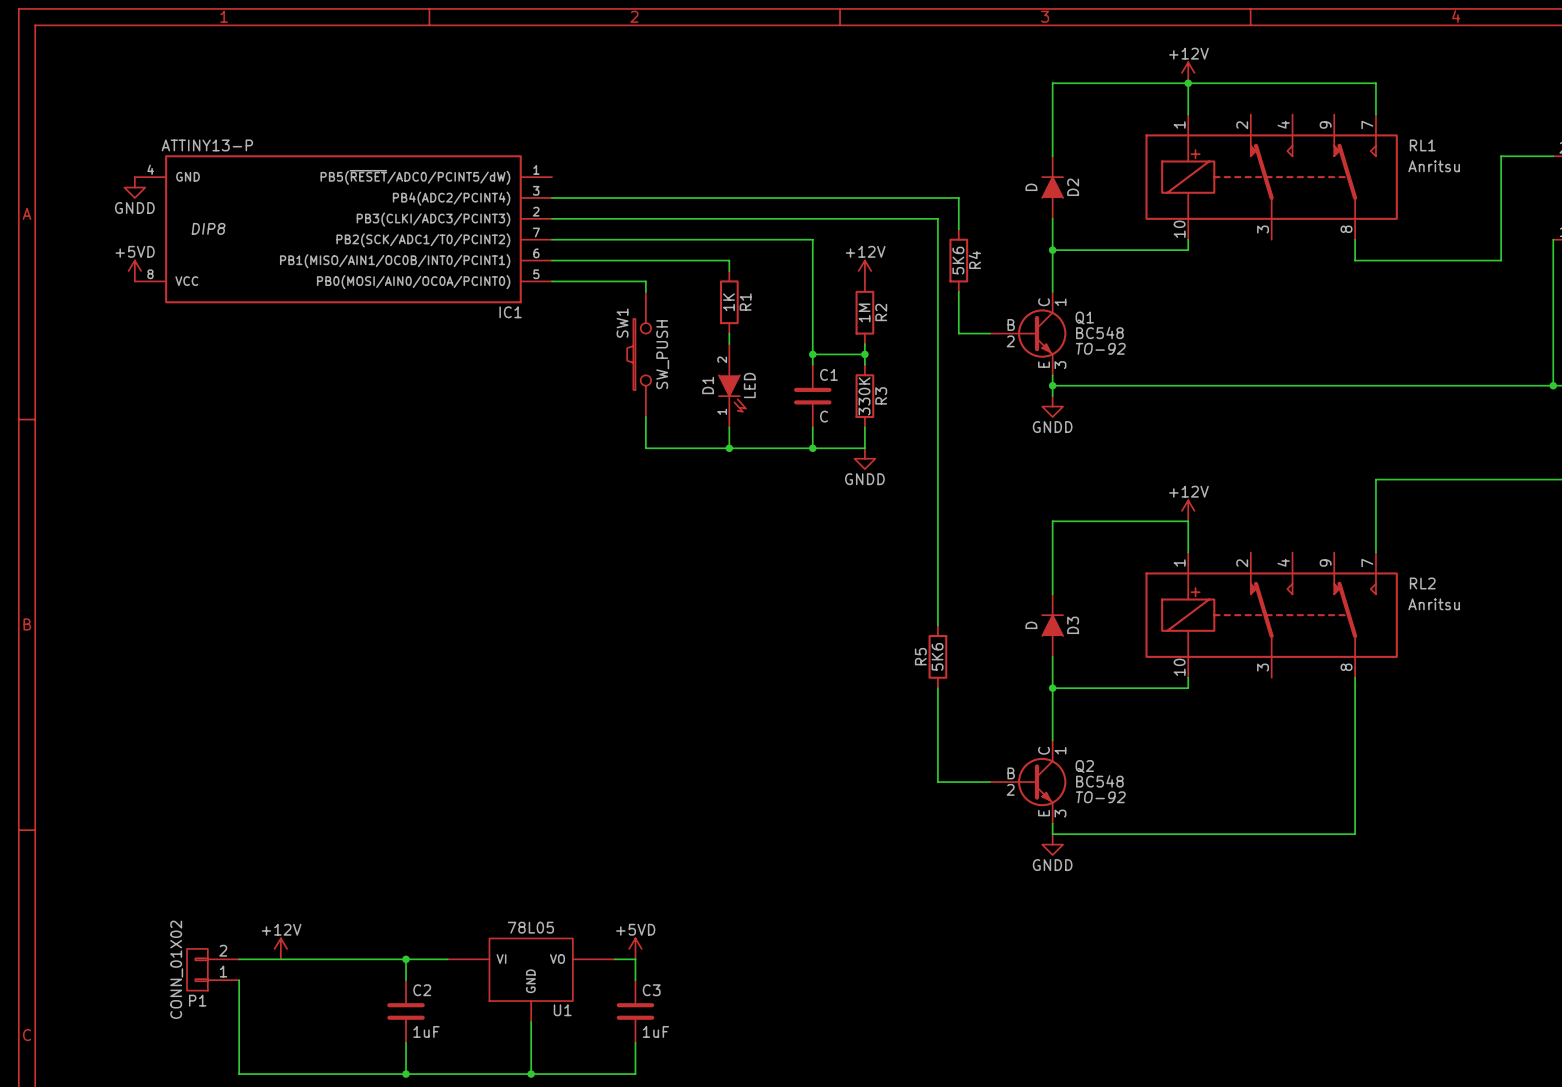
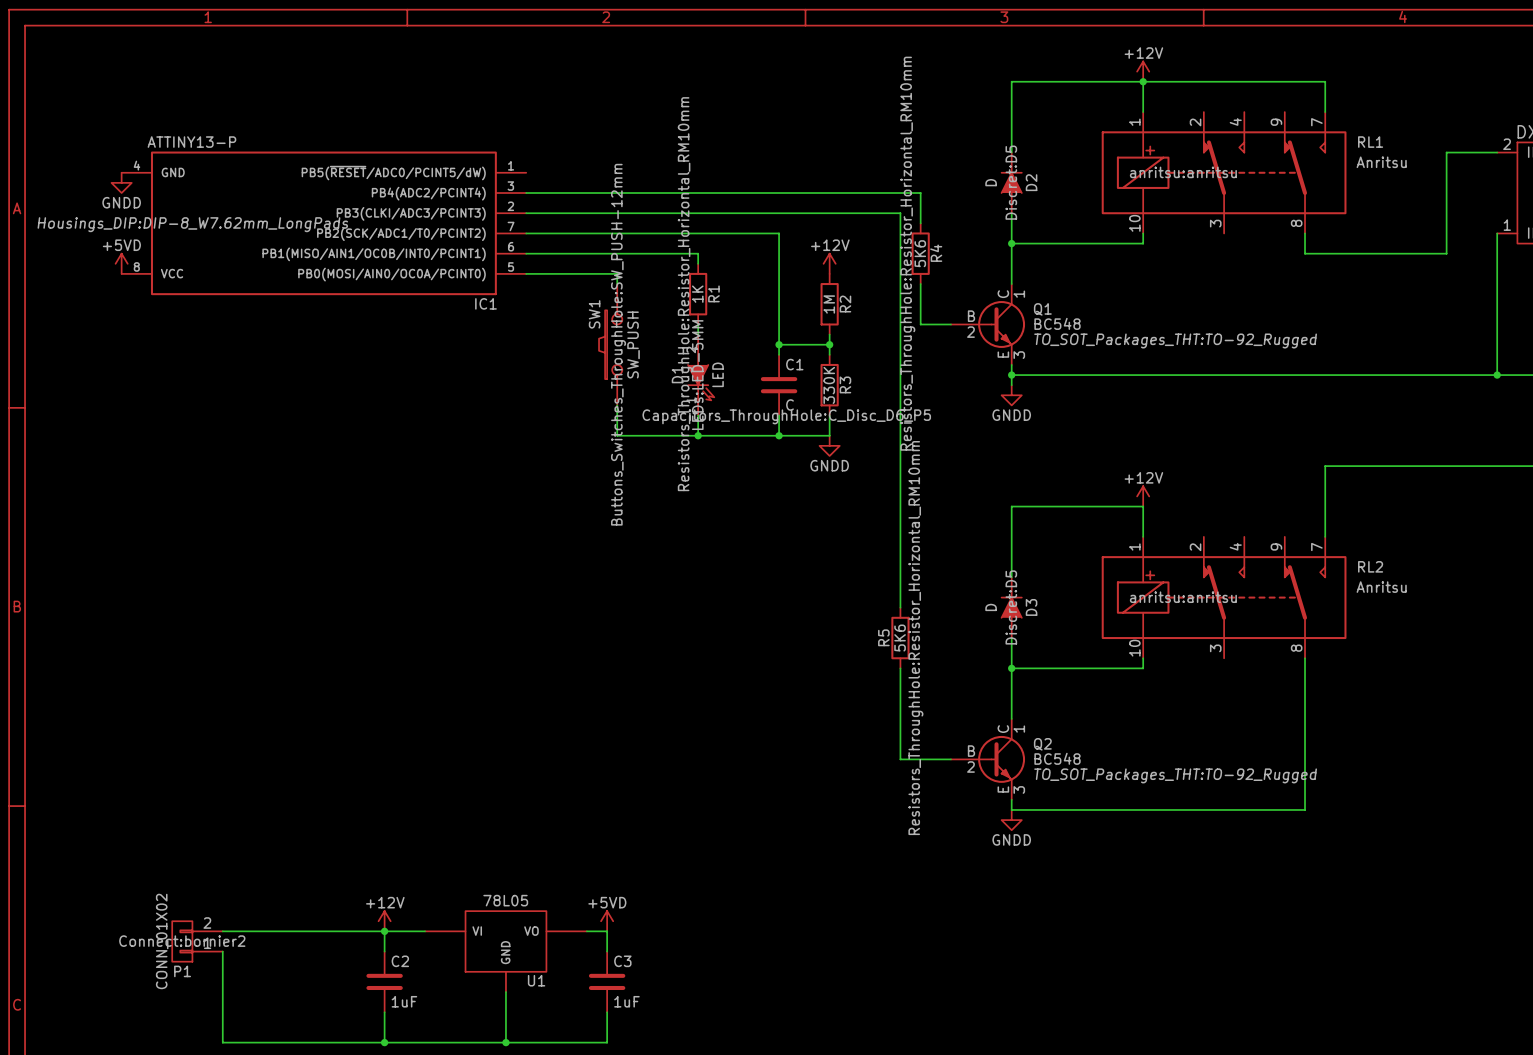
RL1 text: none -> anritsu:anritsu (1183, 172)
D2 text: none -> Discret:D5 (1011, 182)
IC1 text: DIP8 (208, 228) -> Housings_DIP:DIP-8_W7.62mm_LongPads (192, 224)
R4 text: none -> Resistors_ThroughHole:Resistor_Horizontal_RM10mm (907, 253)
R1 text: none -> Resistors_ThroughHole:Resistor_Horizontal_RM10mm (685, 294)
Q1 text: TO-92 (1100, 348) -> TO_SOT_Packages_THT:TO-92_Rugged (1175, 340)
SW1 text: none -> Buttons_Switches_ThroughHole:SW_PUSH-12mm (618, 344)
D1 text: none -> LEDs:LED-5MM (697, 375)
C1 text: none -> Capacitors_ThroughHole:C_Disc_D6_P5 (786, 416)
RL2 text: none -> anritsu:anritsu (1183, 597)
D3 text: none -> Discret:D5 (1011, 607)
R5 text: none -> Resistors_ThroughHole:Resistor_Horizontal_RM10mm (915, 638)
Q2 text: TO-92 (1100, 797) -> TO_SOT_Packages_THT:TO-92_Rugged (1175, 775)
power symbol position: +12V (280, 948) -> +12V (384, 921)
P1 text: none -> Connect:bornier2 (182, 941)

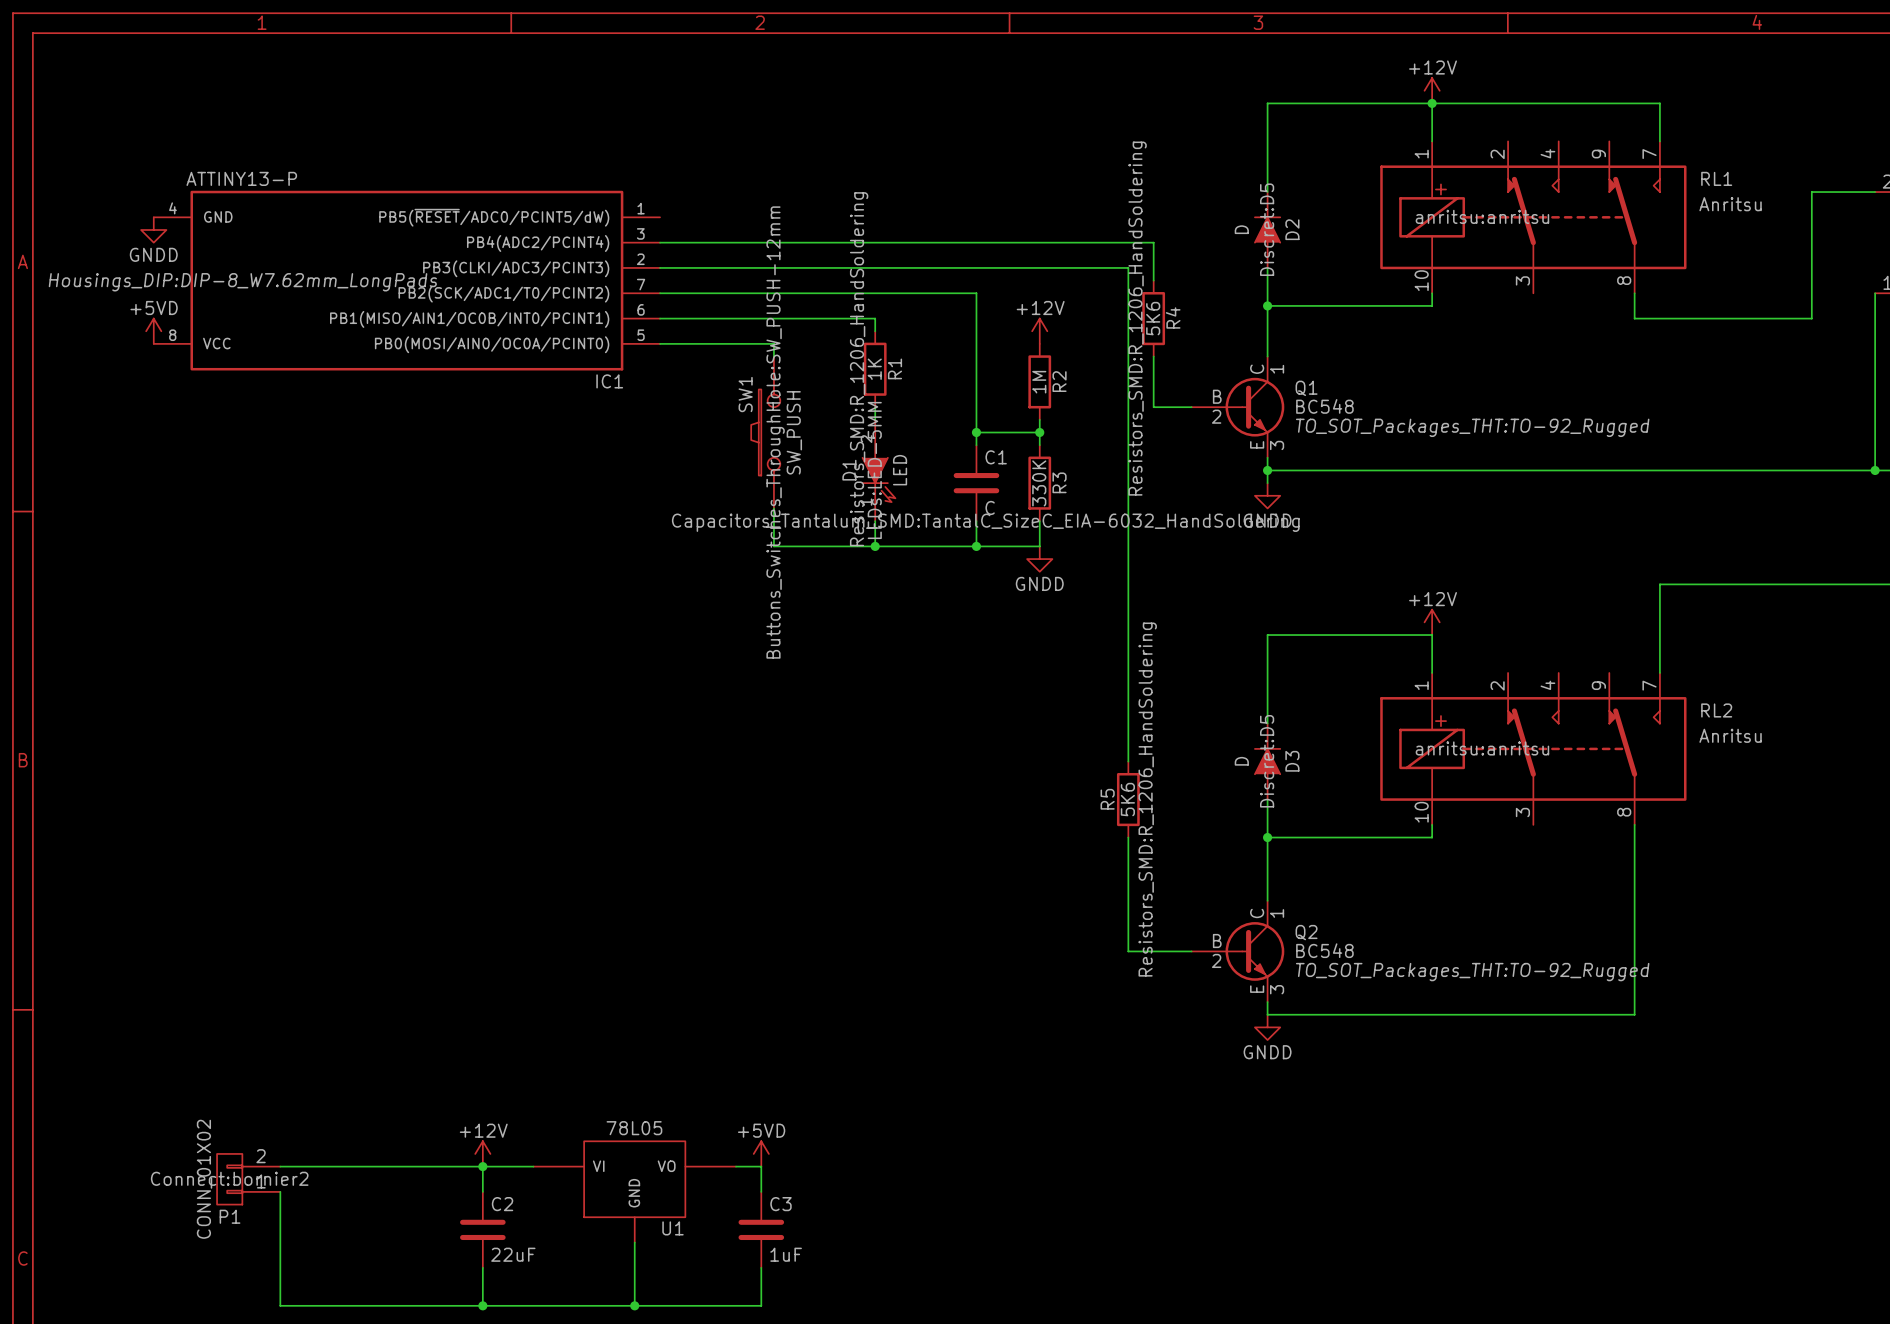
R4 text: Resistors_ThroughHole:Resistor_Horizontal_RM10mm (907, 253) -> Resistors_SMD:R_1206_HandSoldering (1137, 318)
R1 text: Resistors_ThroughHole:Resistor_Horizontal_RM10mm (685, 294) -> Resistors_SMD:R_1206_HandSoldering (859, 369)
C1 text: Capacitors_ThroughHole:C_Disc_D6_P5 (786, 416) -> Capacitors_Tantalum_SMD:TantalC_SizeC_EIA-6032_HandSoldering (985, 522)
R5 text: Resistors_ThroughHole:Resistor_Horizontal_RM10mm (915, 638) -> Resistors_SMD:R_1206_HandSoldering (1147, 799)
C2 value: 1uF (404, 1001) -> 22uF (513, 1254)

